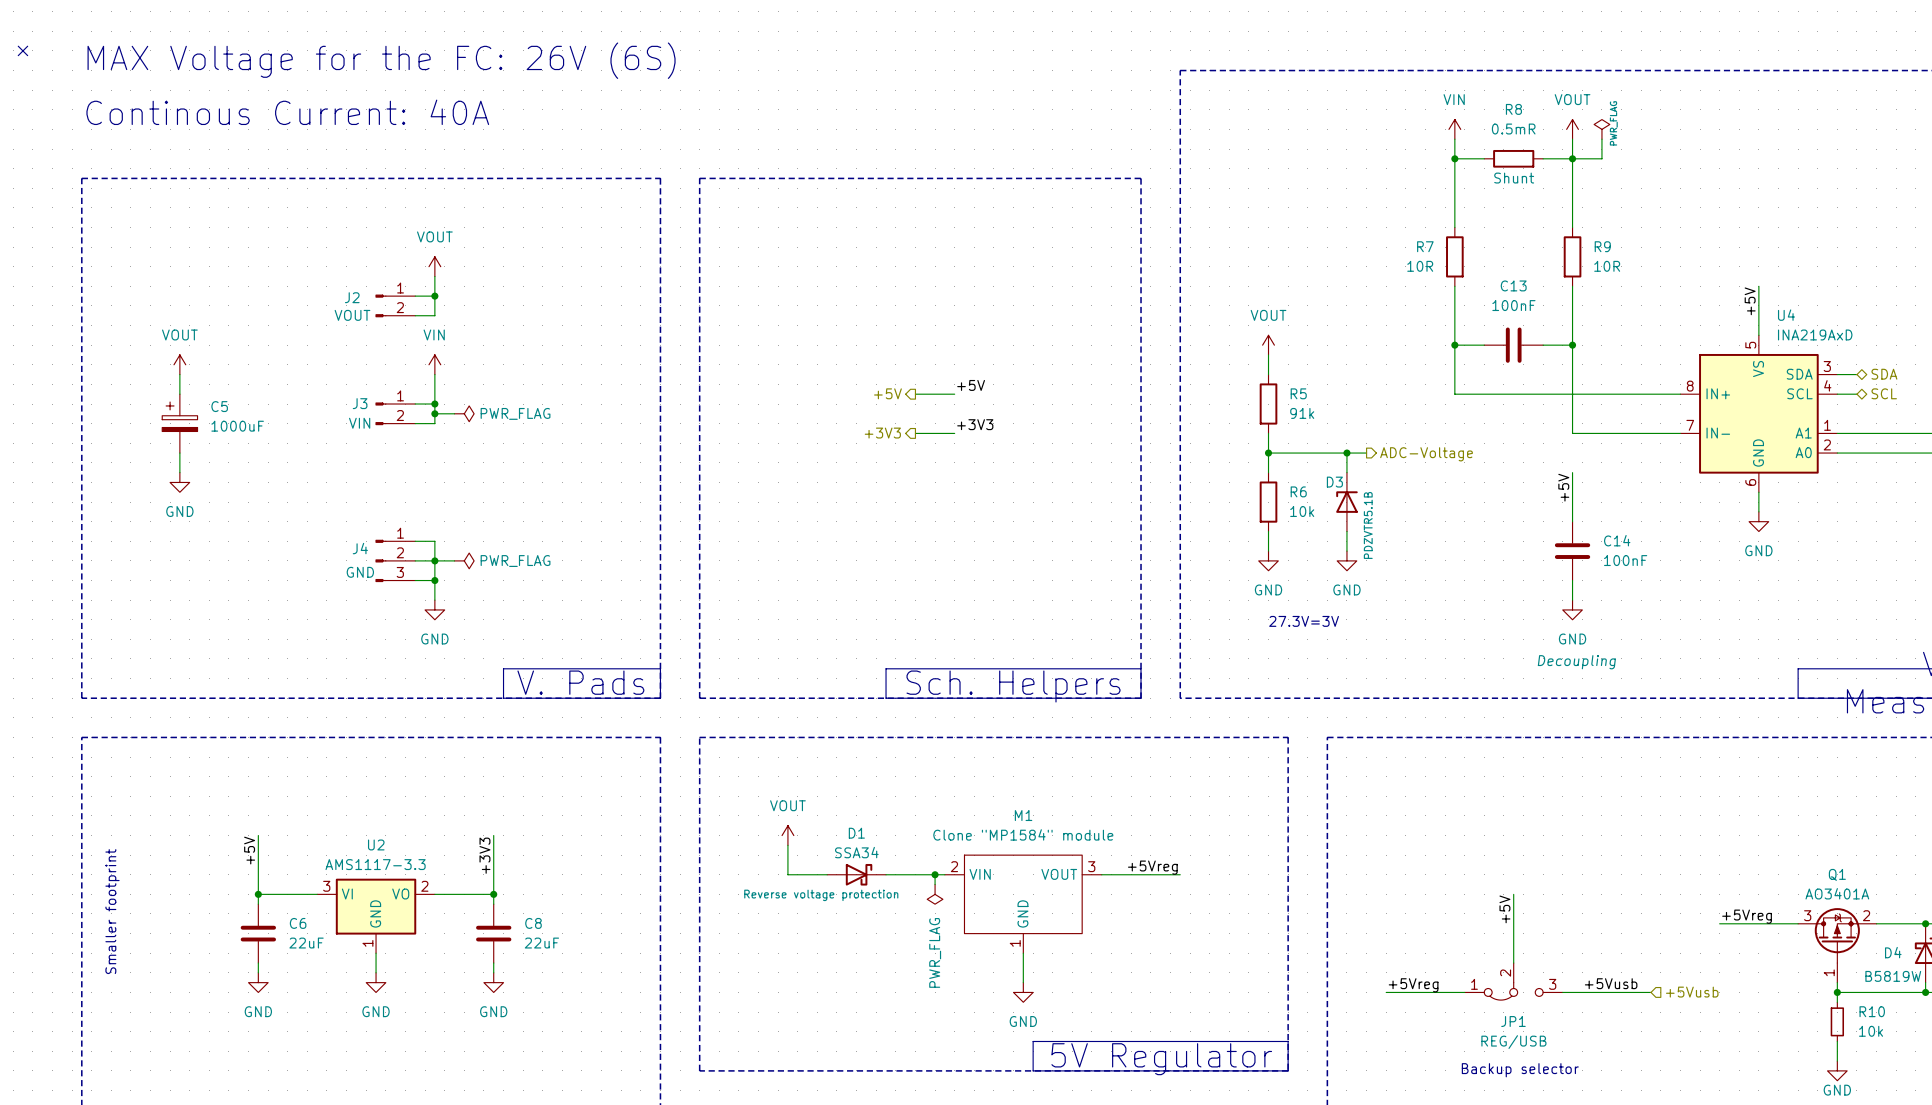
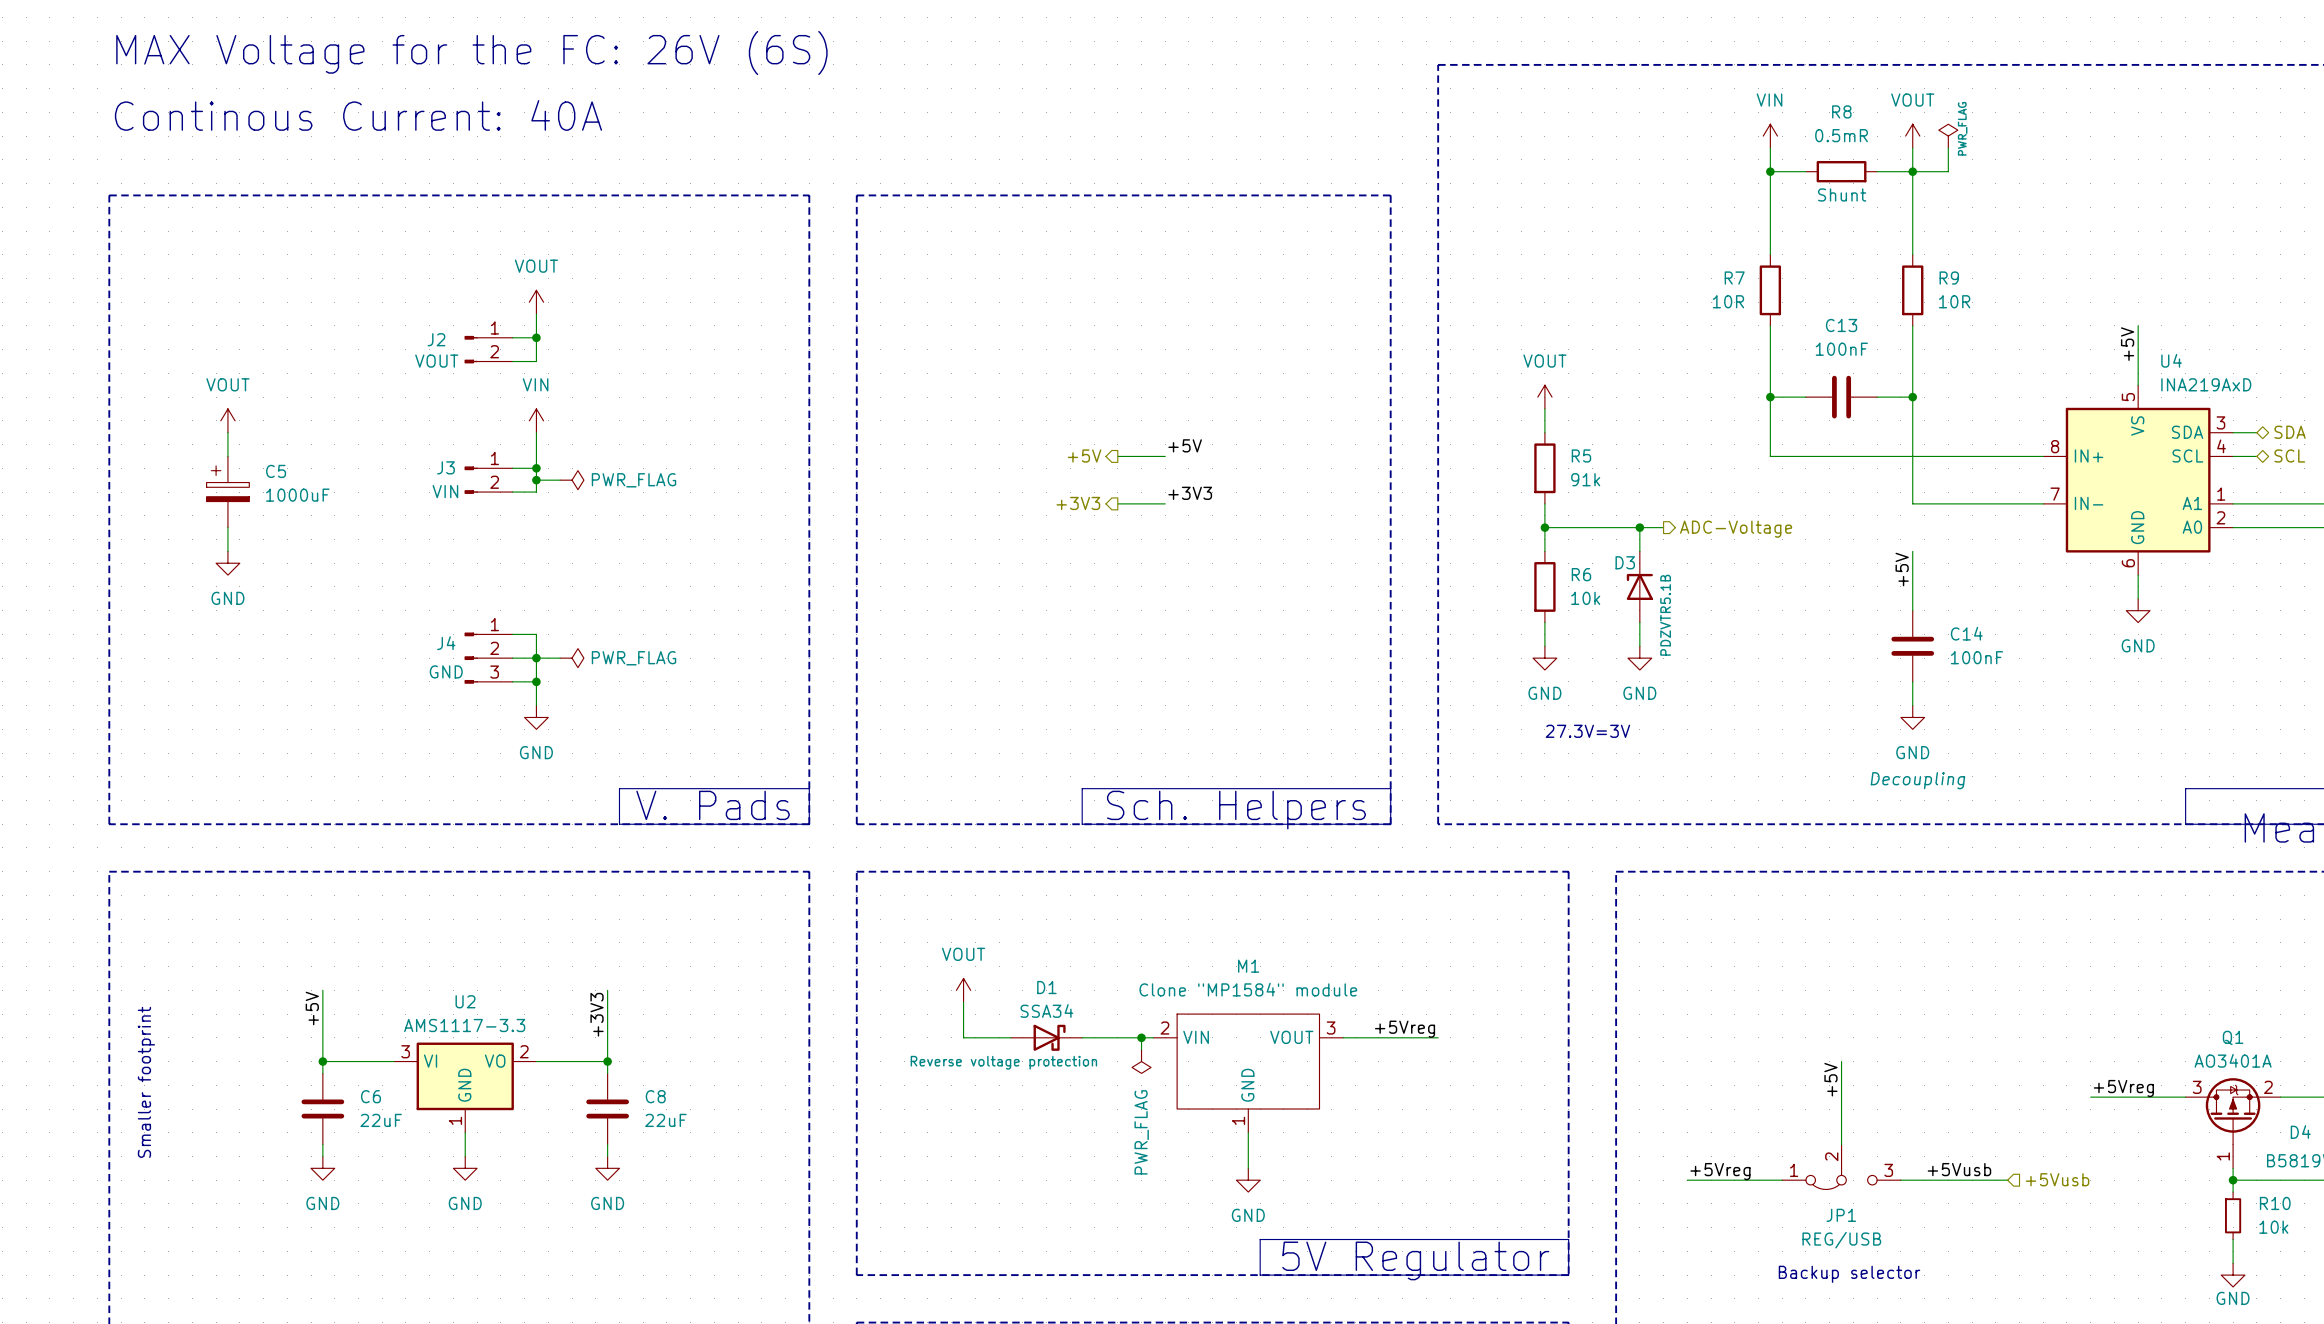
no-connect mark: (22, 50) -> none

